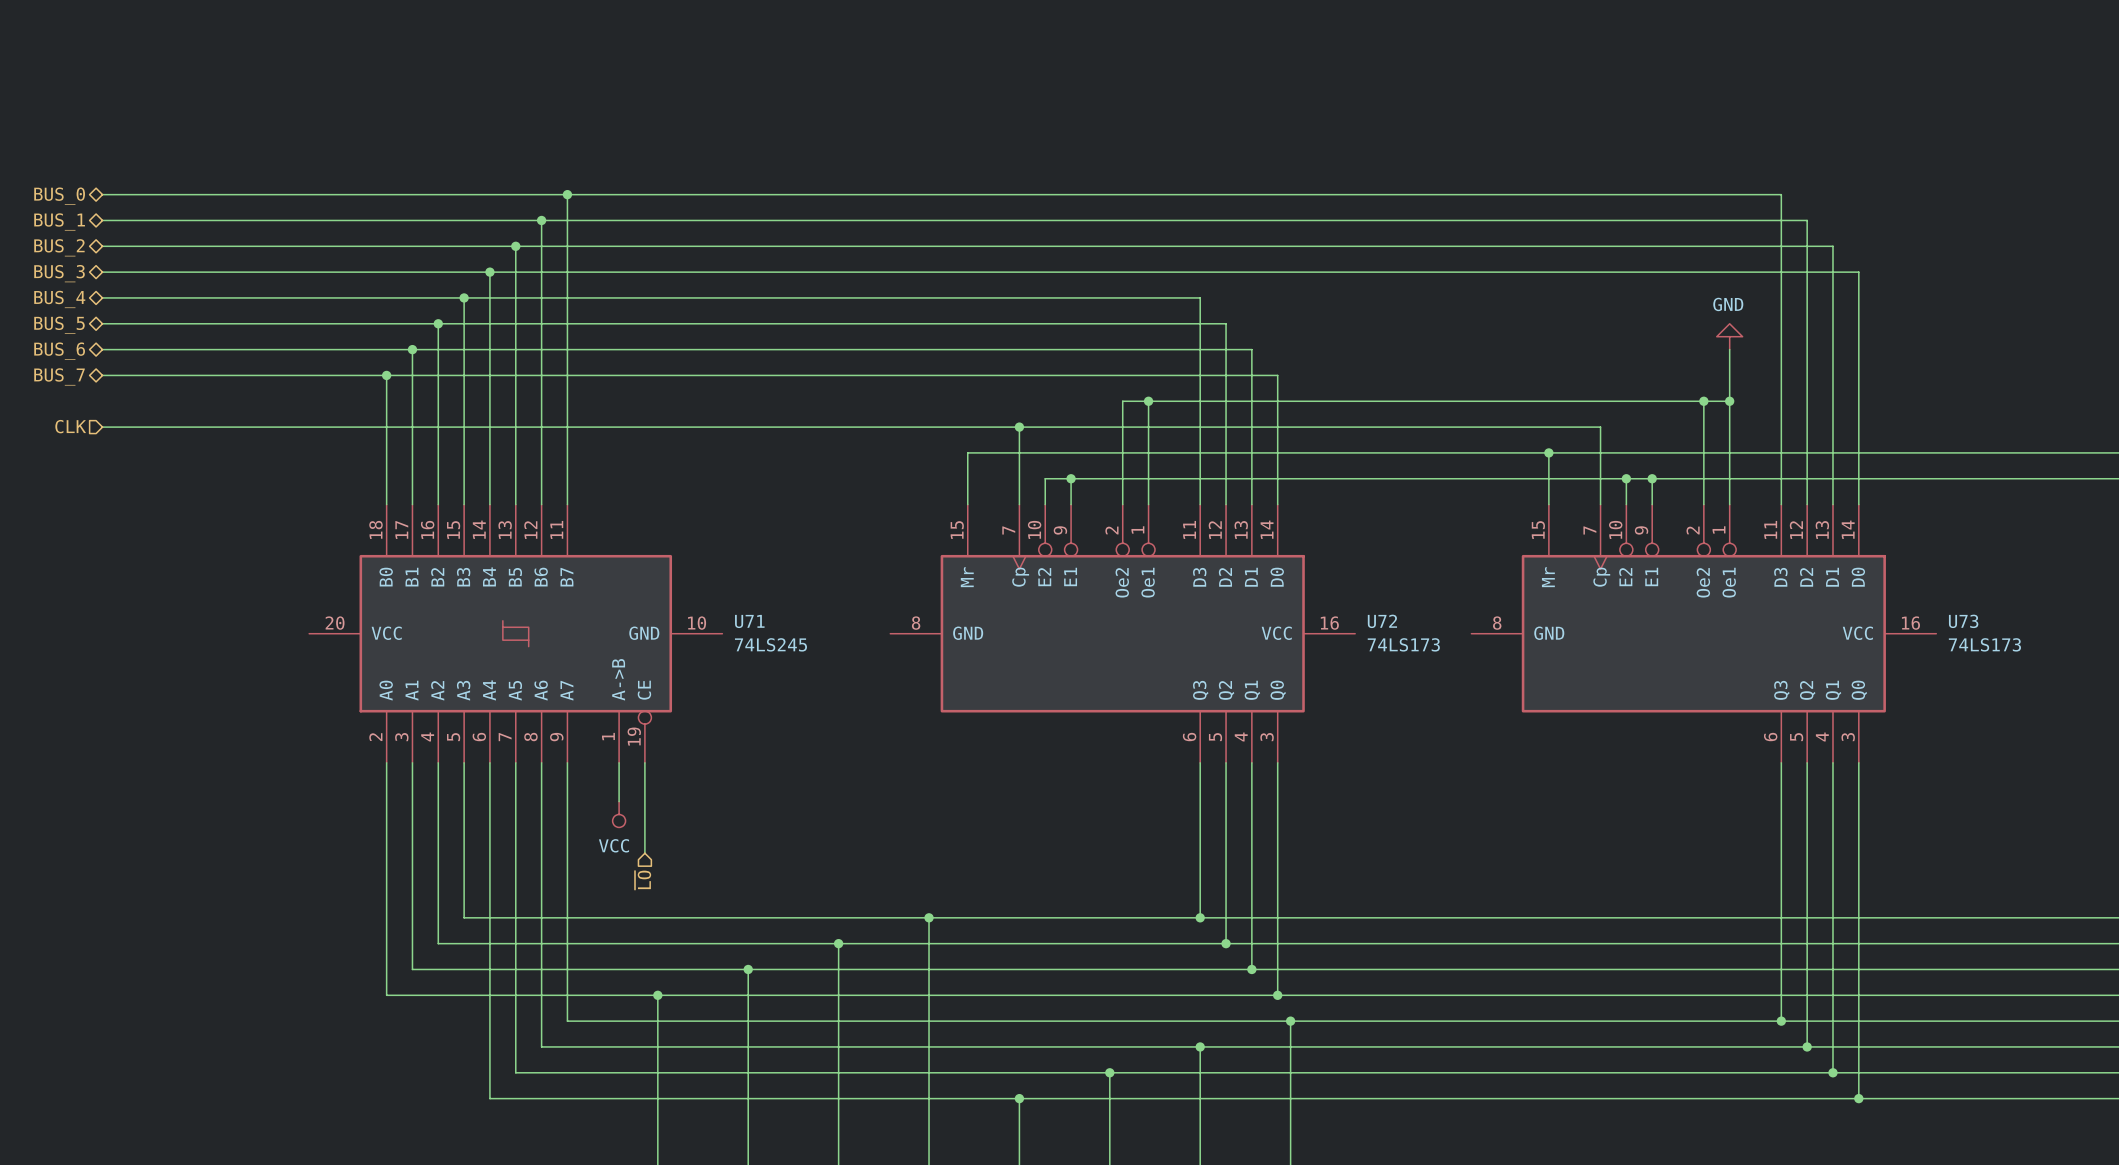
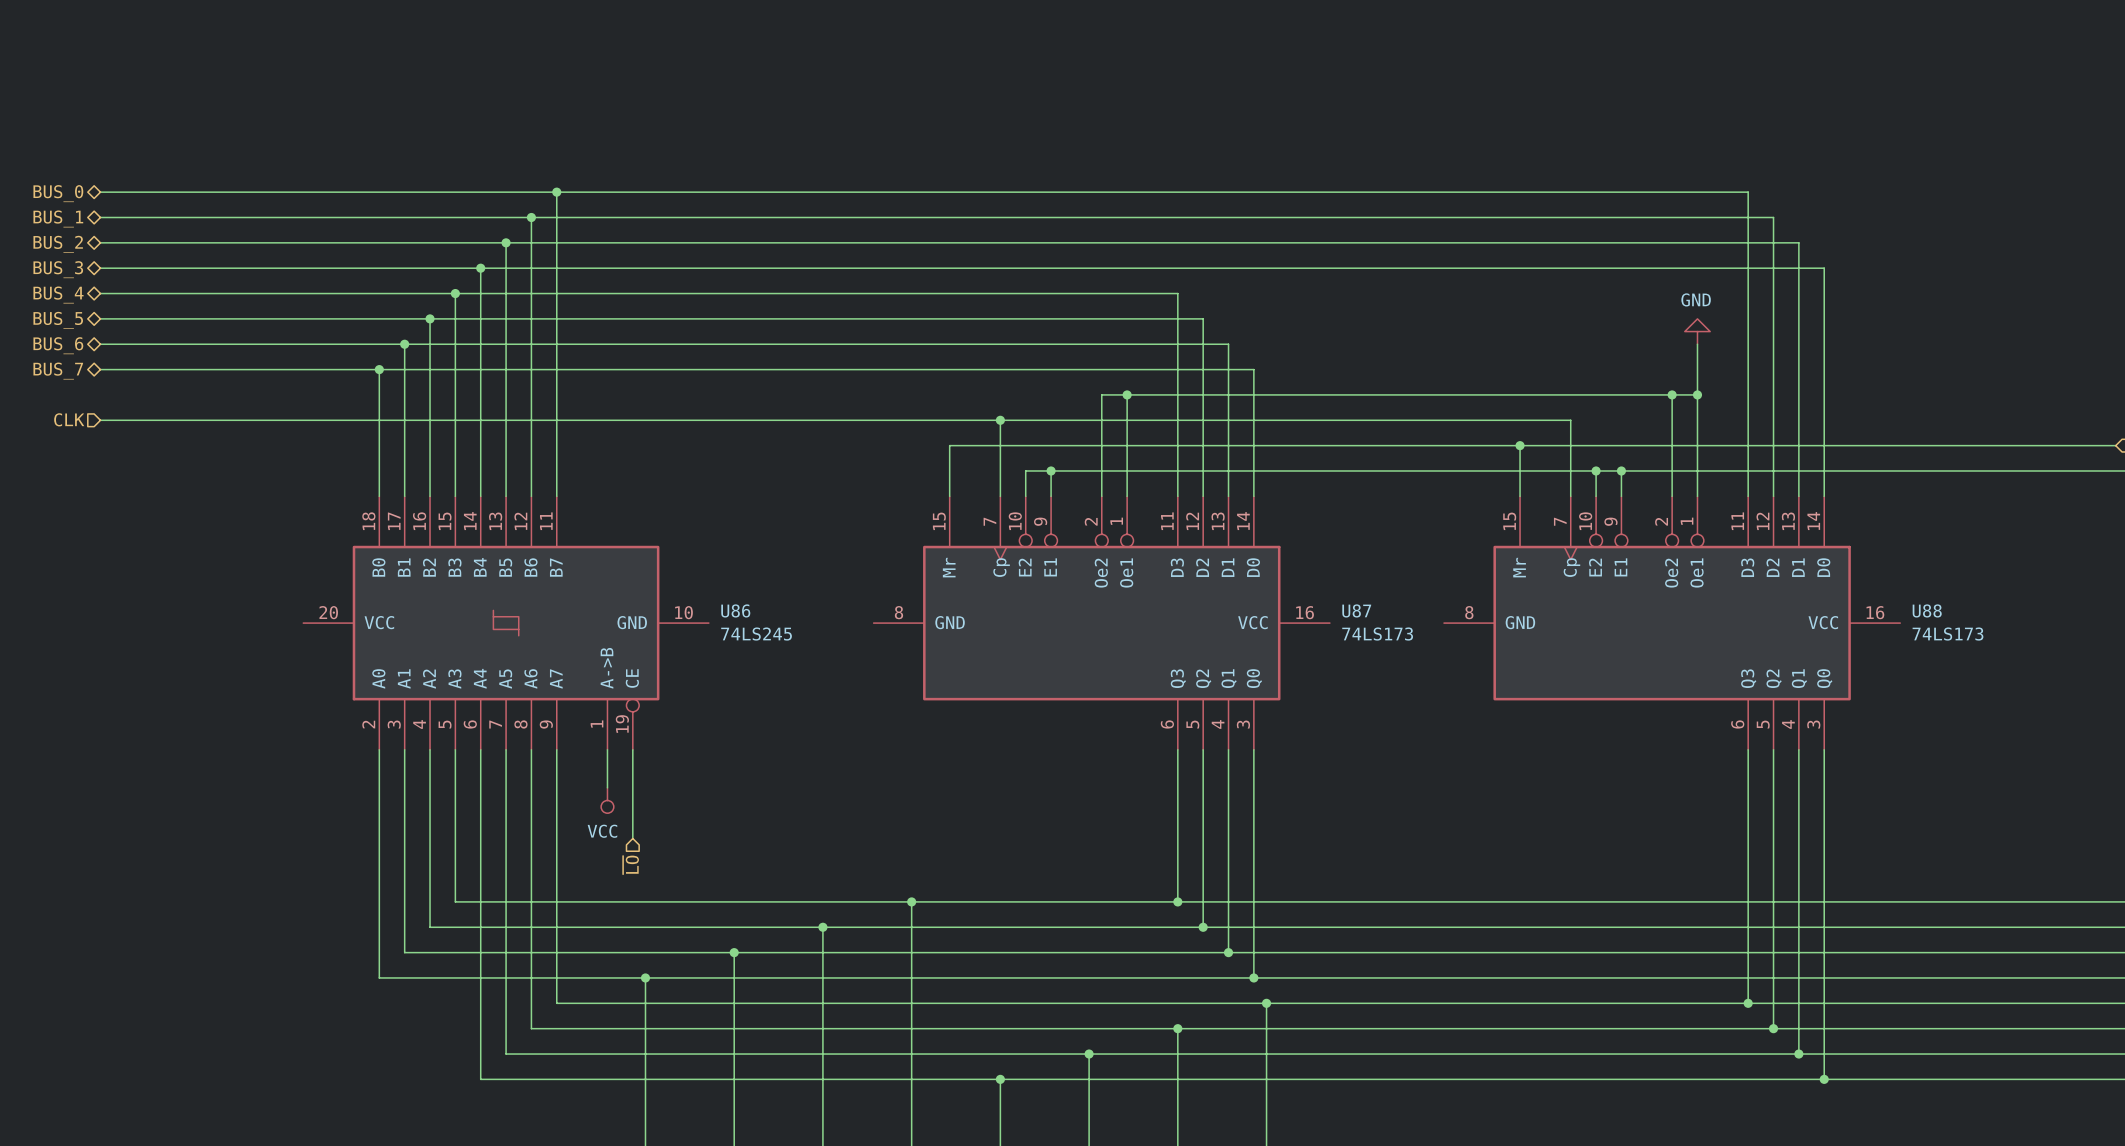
U71 name: U71 (749, 621) -> U86 (735, 610)
U72 name: U72 (1382, 621) -> U87 (1356, 610)
U73 name: U73 (1963, 621) -> U88 (1927, 610)

